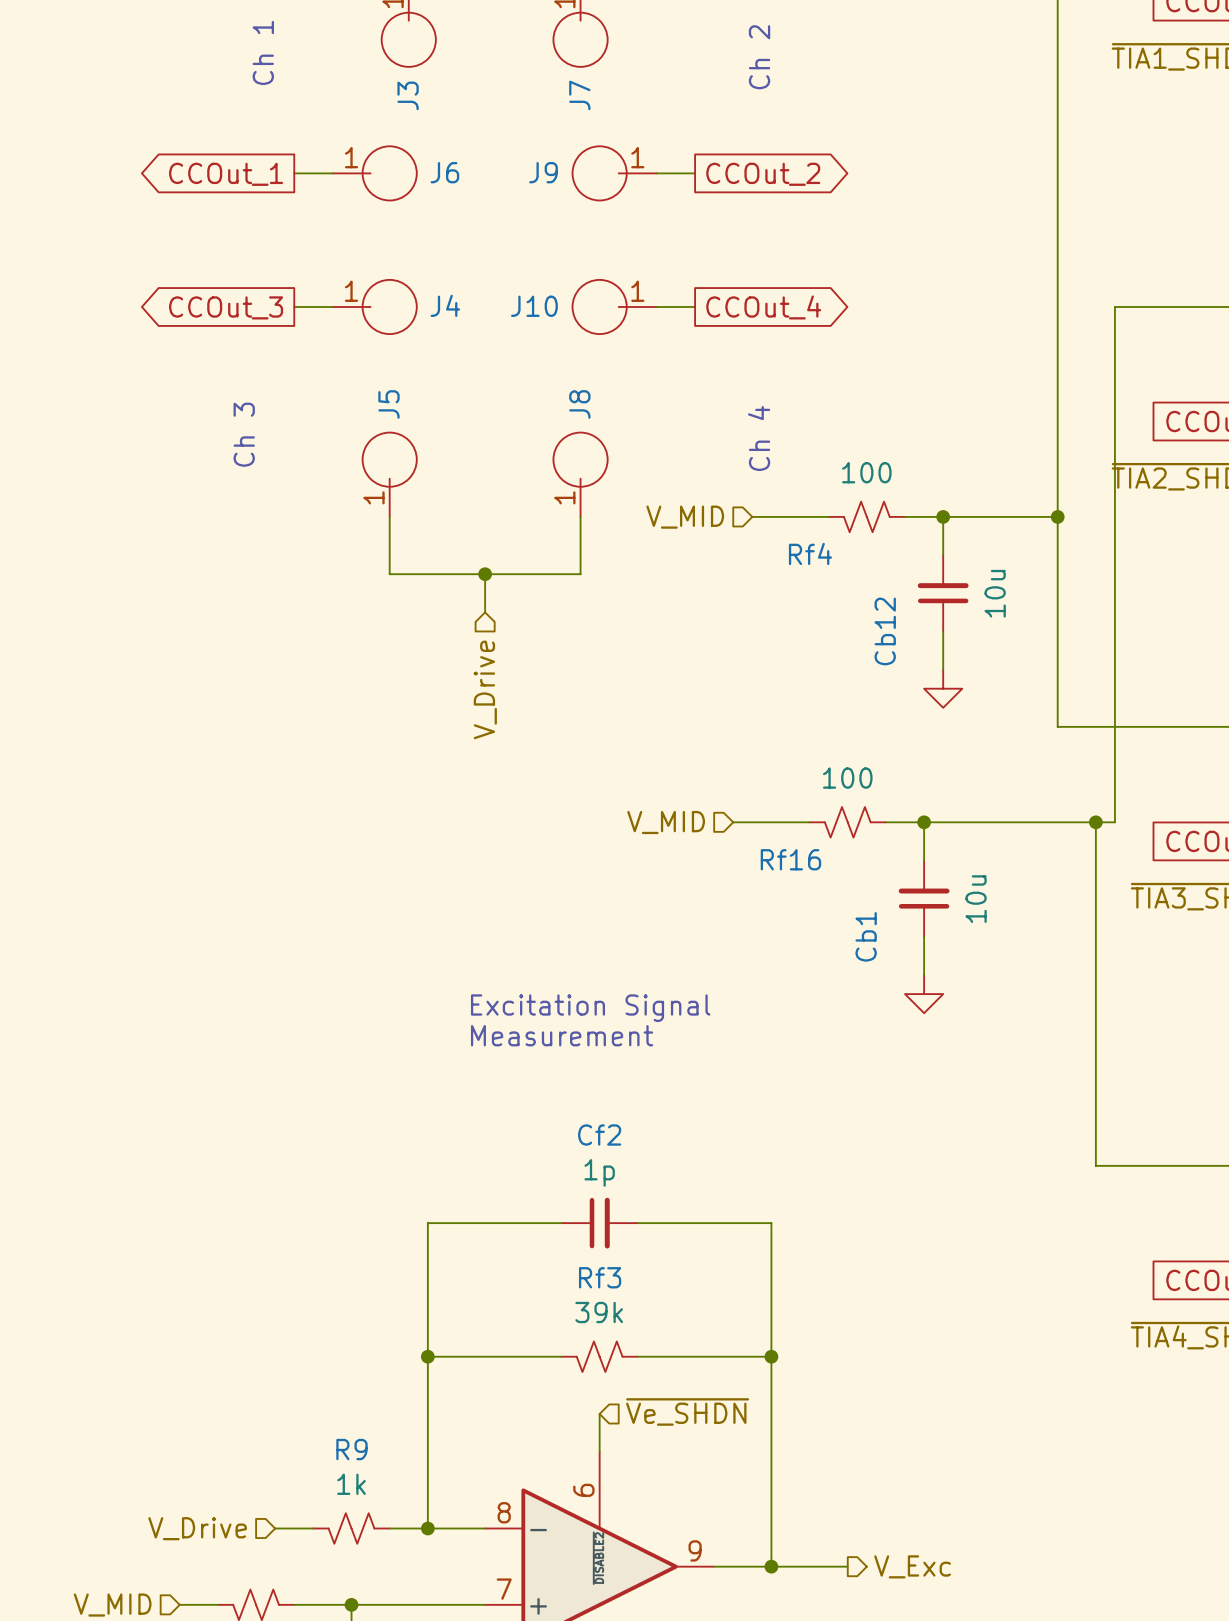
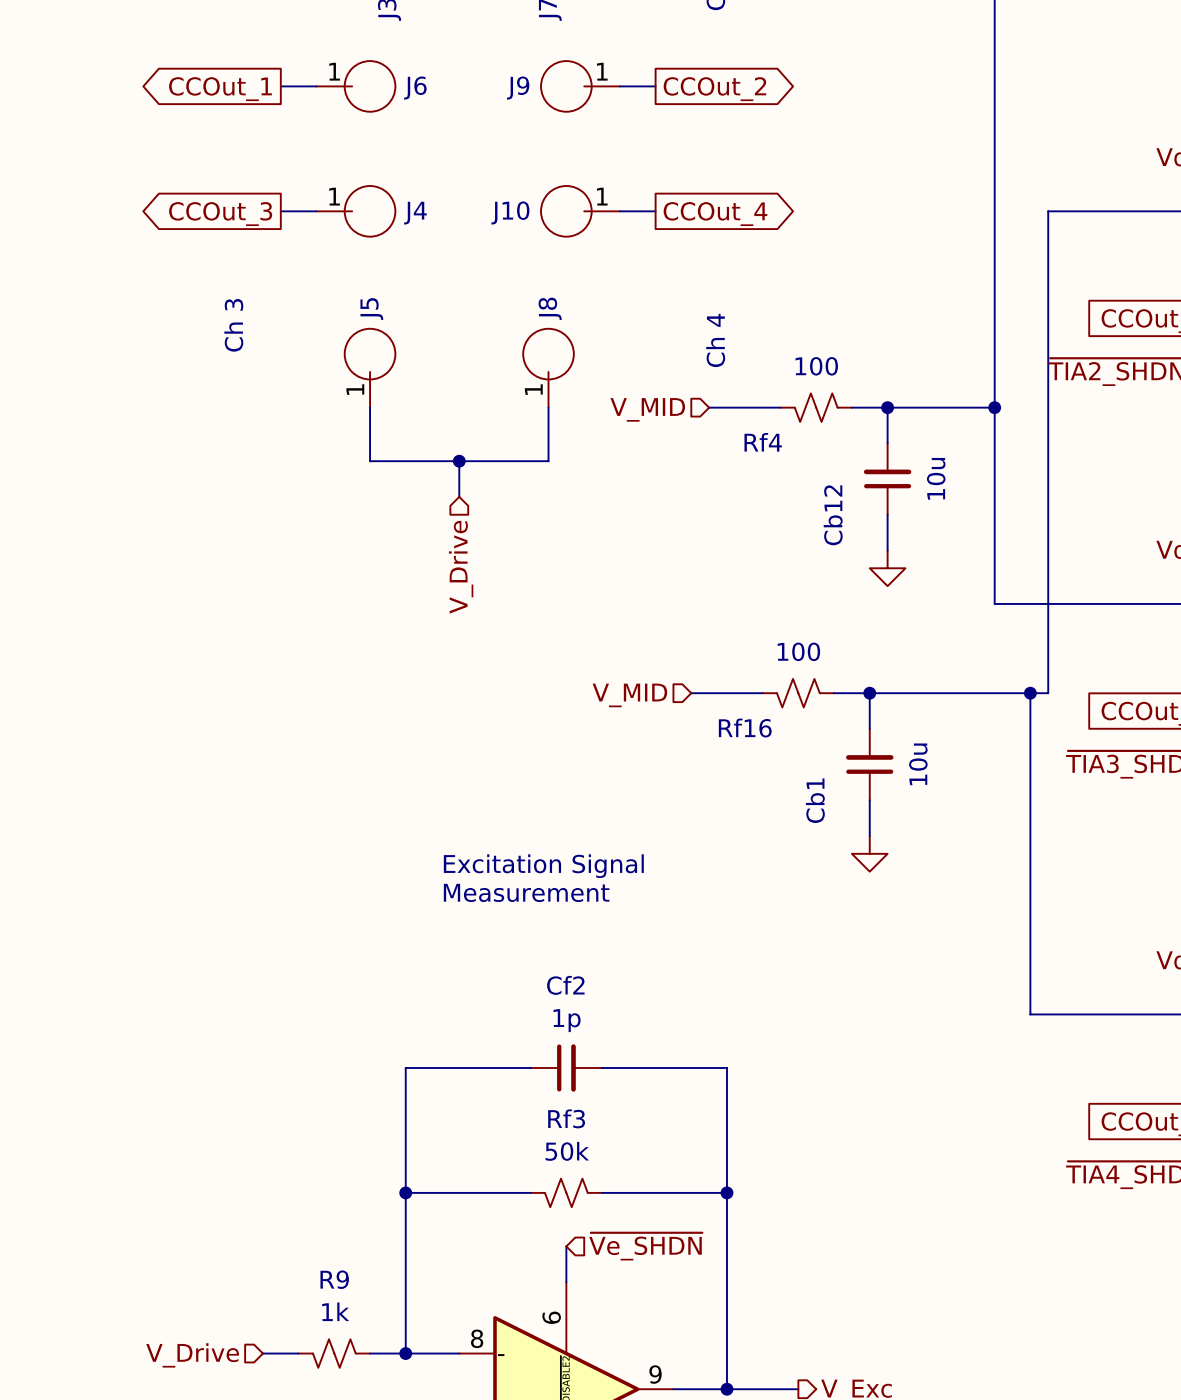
Rf3 value: 39k (599, 1312) -> 50k (567, 1151)

